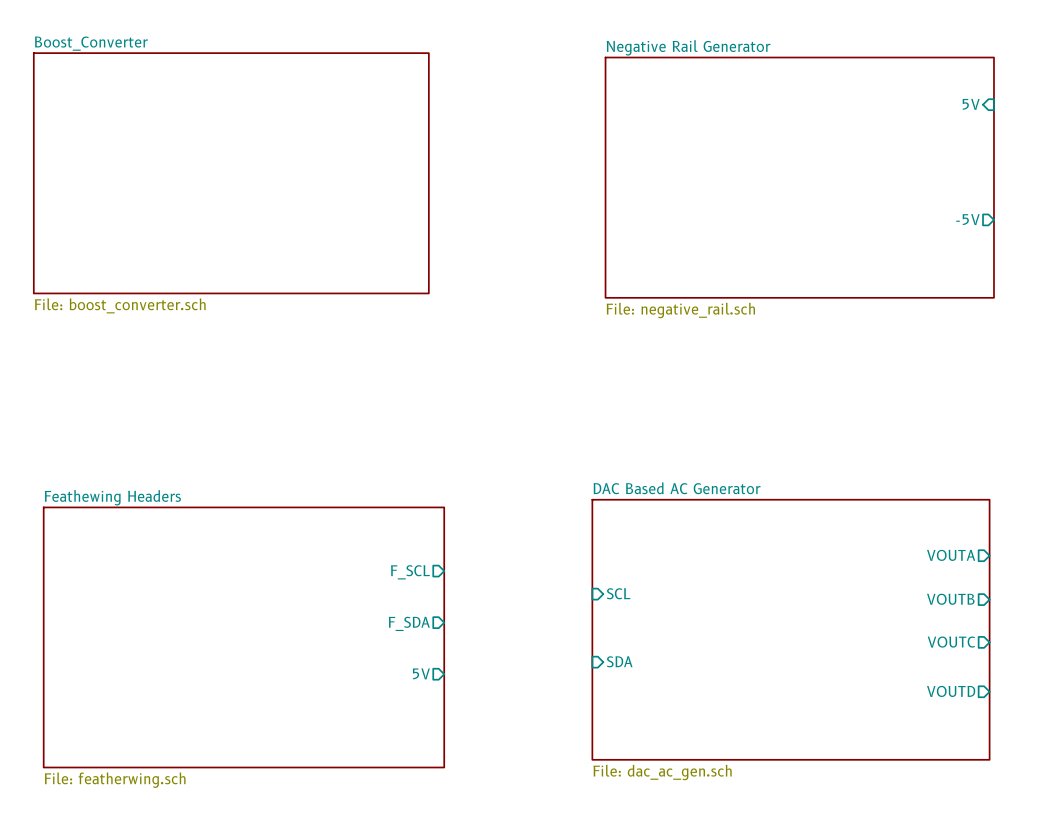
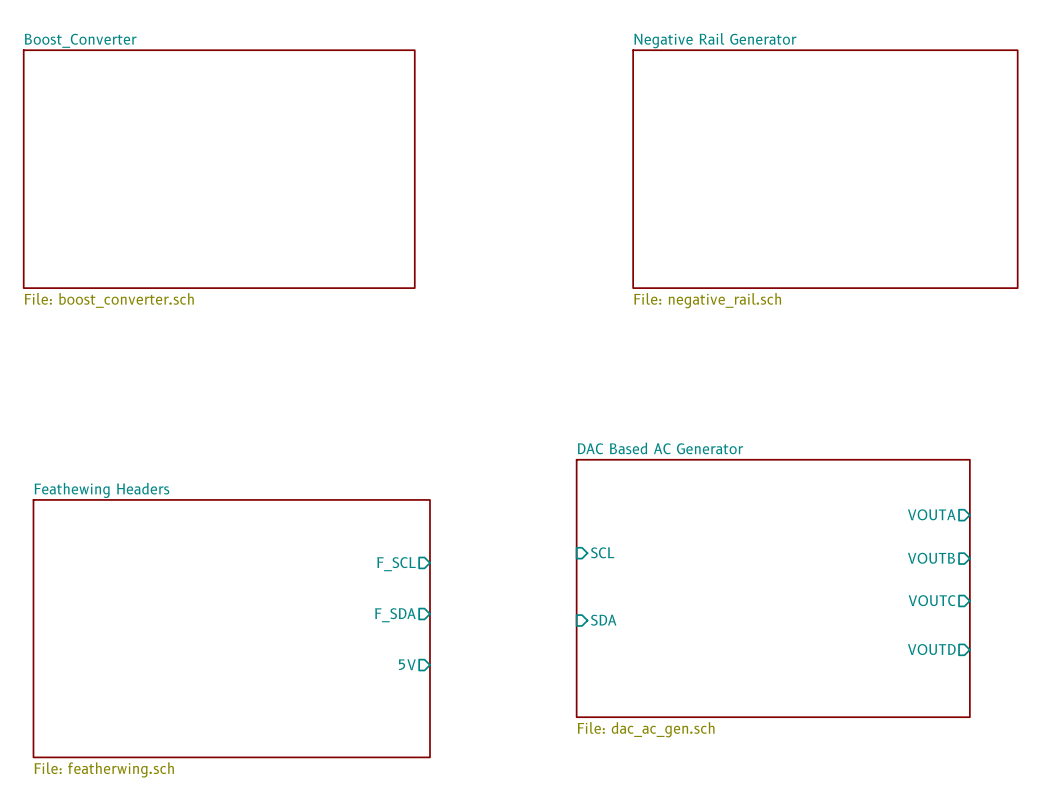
sheet pin: 5V (971, 104) -> none
sheet Negative Rail Generator position: (799, 177) -> (825, 169)
sheet pin: -5V (967, 219) -> none
sheet pin position: VOUTA (951, 555) -> VOUTA (931, 514)
sheet pin position: SCL (618, 593) -> SCL (602, 552)
sheet pin position: VOUTB (950, 599) -> VOUTB (931, 558)
sheet DAC Based AC Generator position: (790, 629) -> (773, 588)
sheet pin position: VOUTC (951, 642) -> VOUTC (932, 600)
sheet pin position: SDA (619, 661) -> SDA (603, 620)
sheet pin position: VOUTD (951, 691) -> VOUTD (931, 649)

